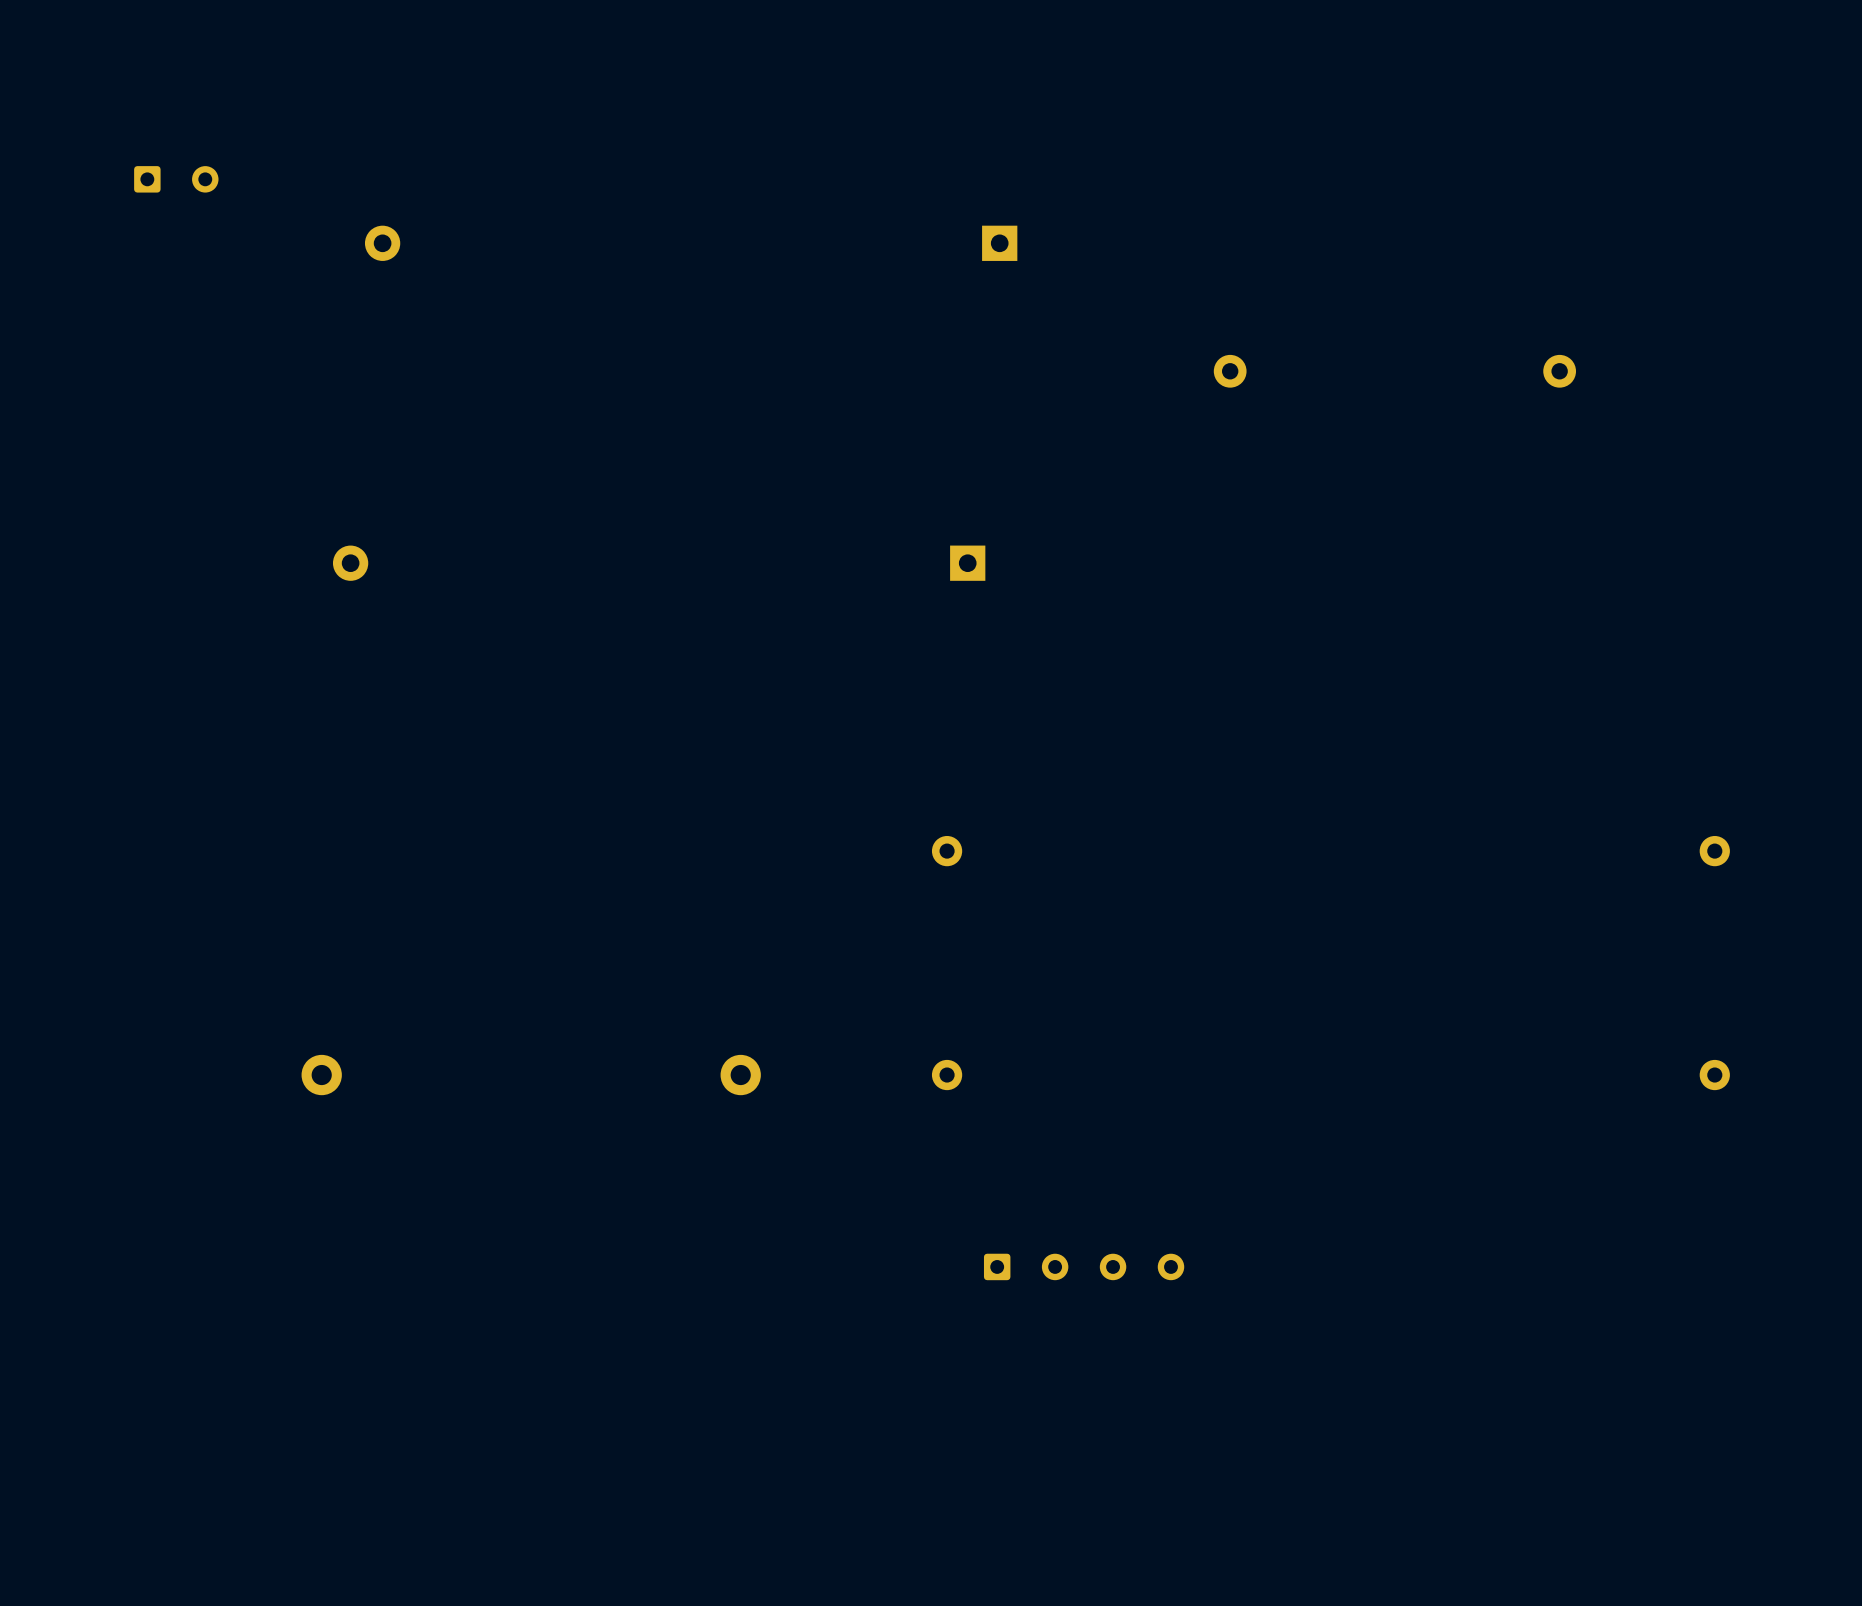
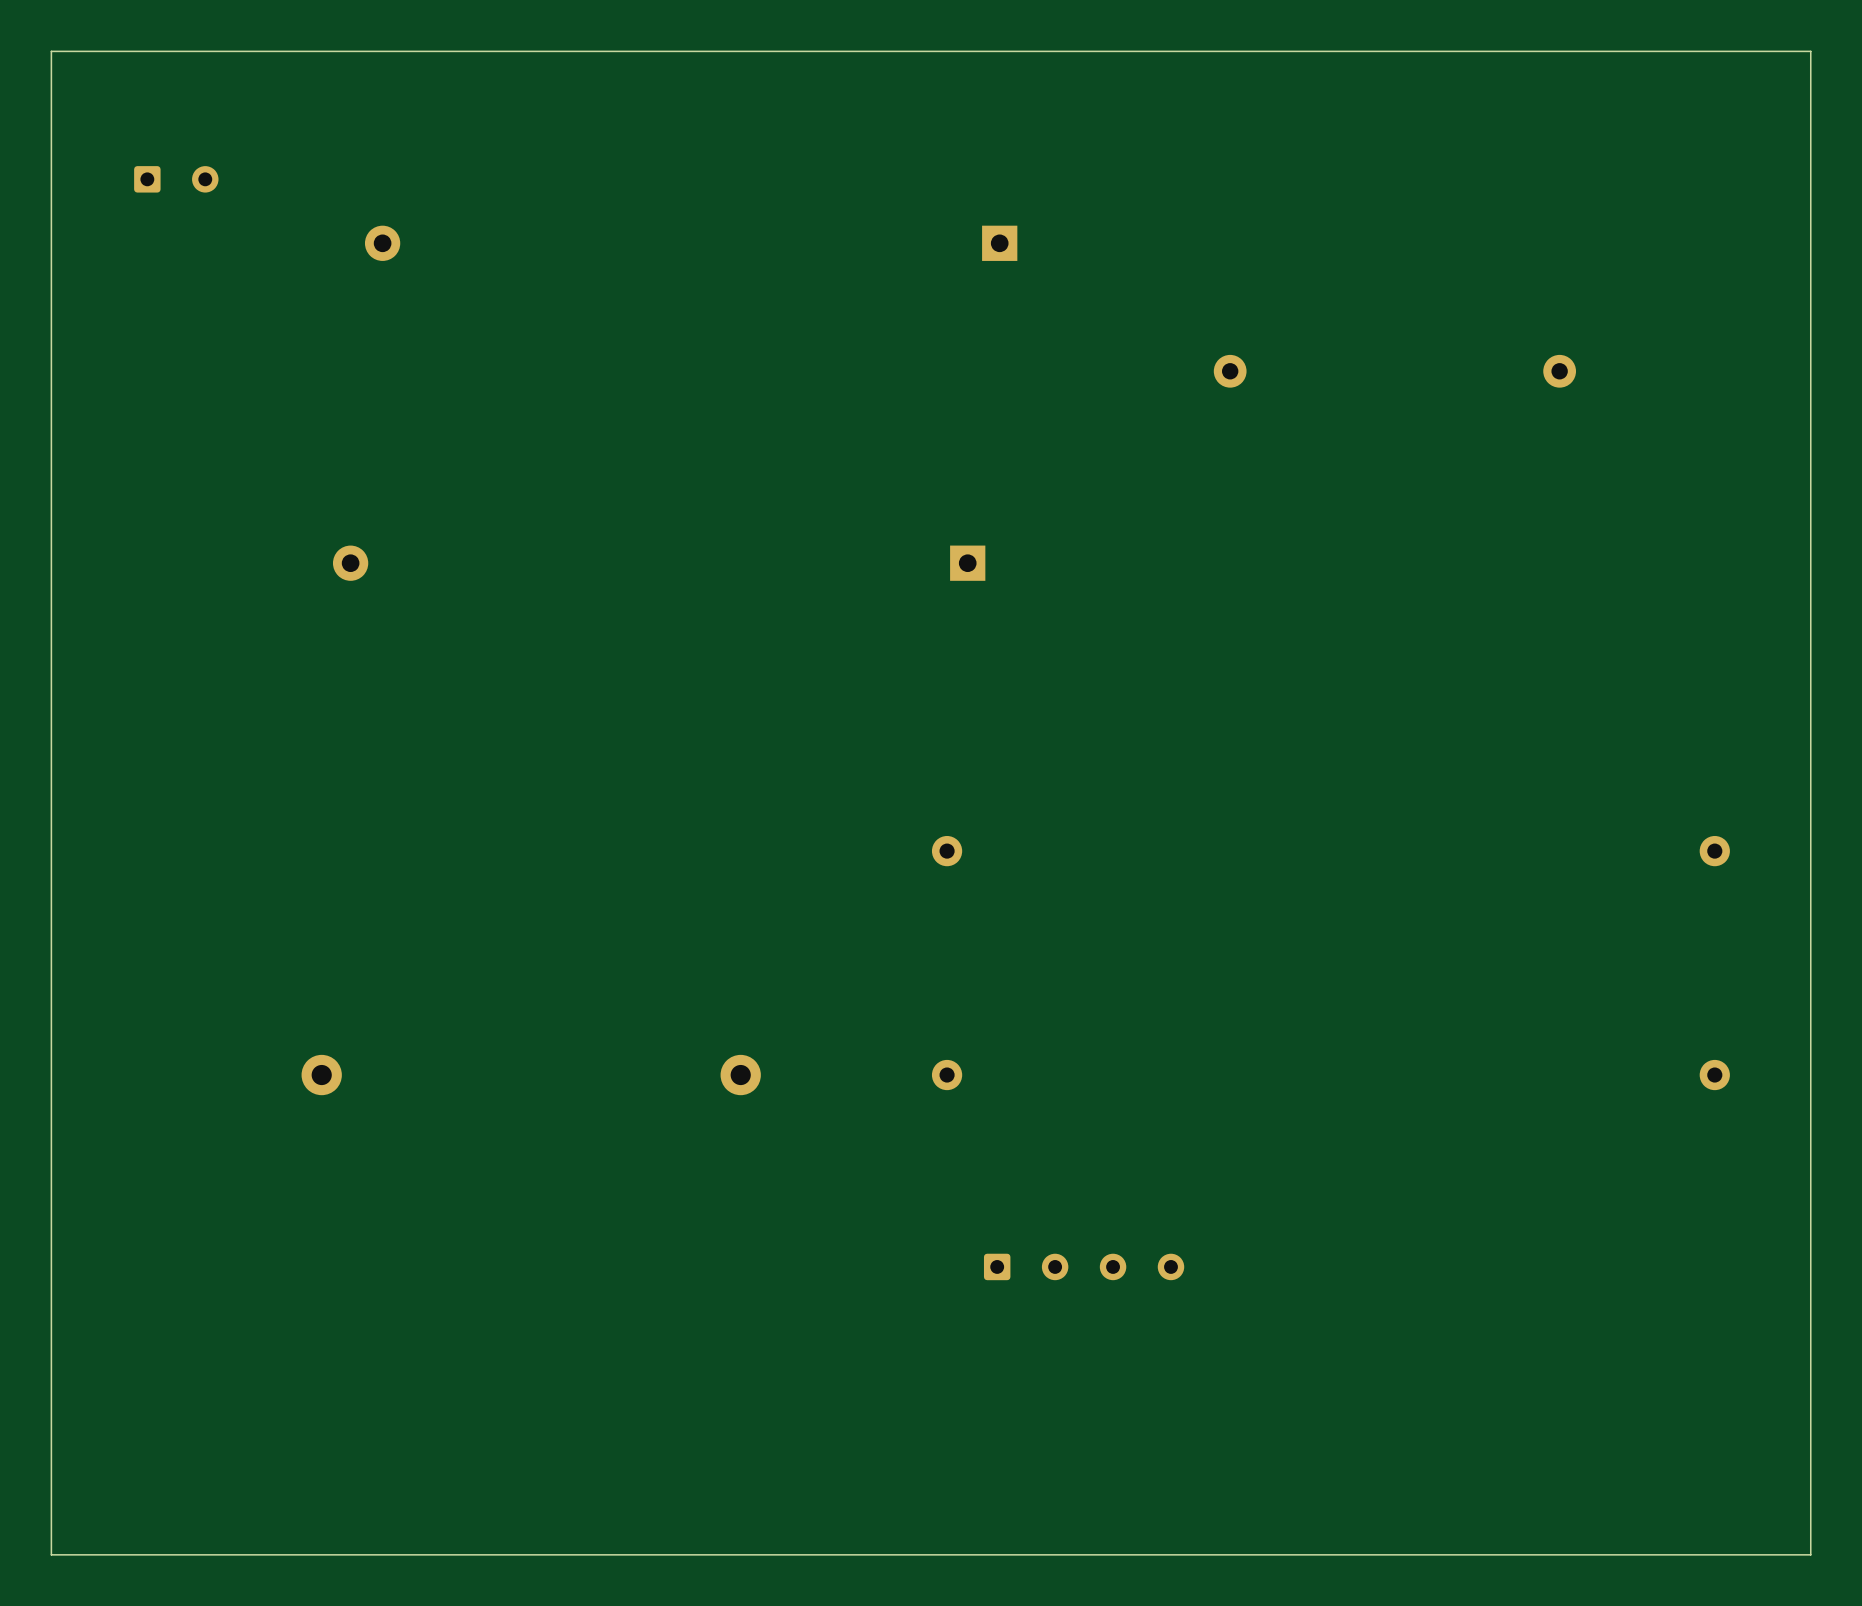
board edge: none -> (1810, 51) (51, 51) (51, 1554) (1810, 1554) (1810, 51)

